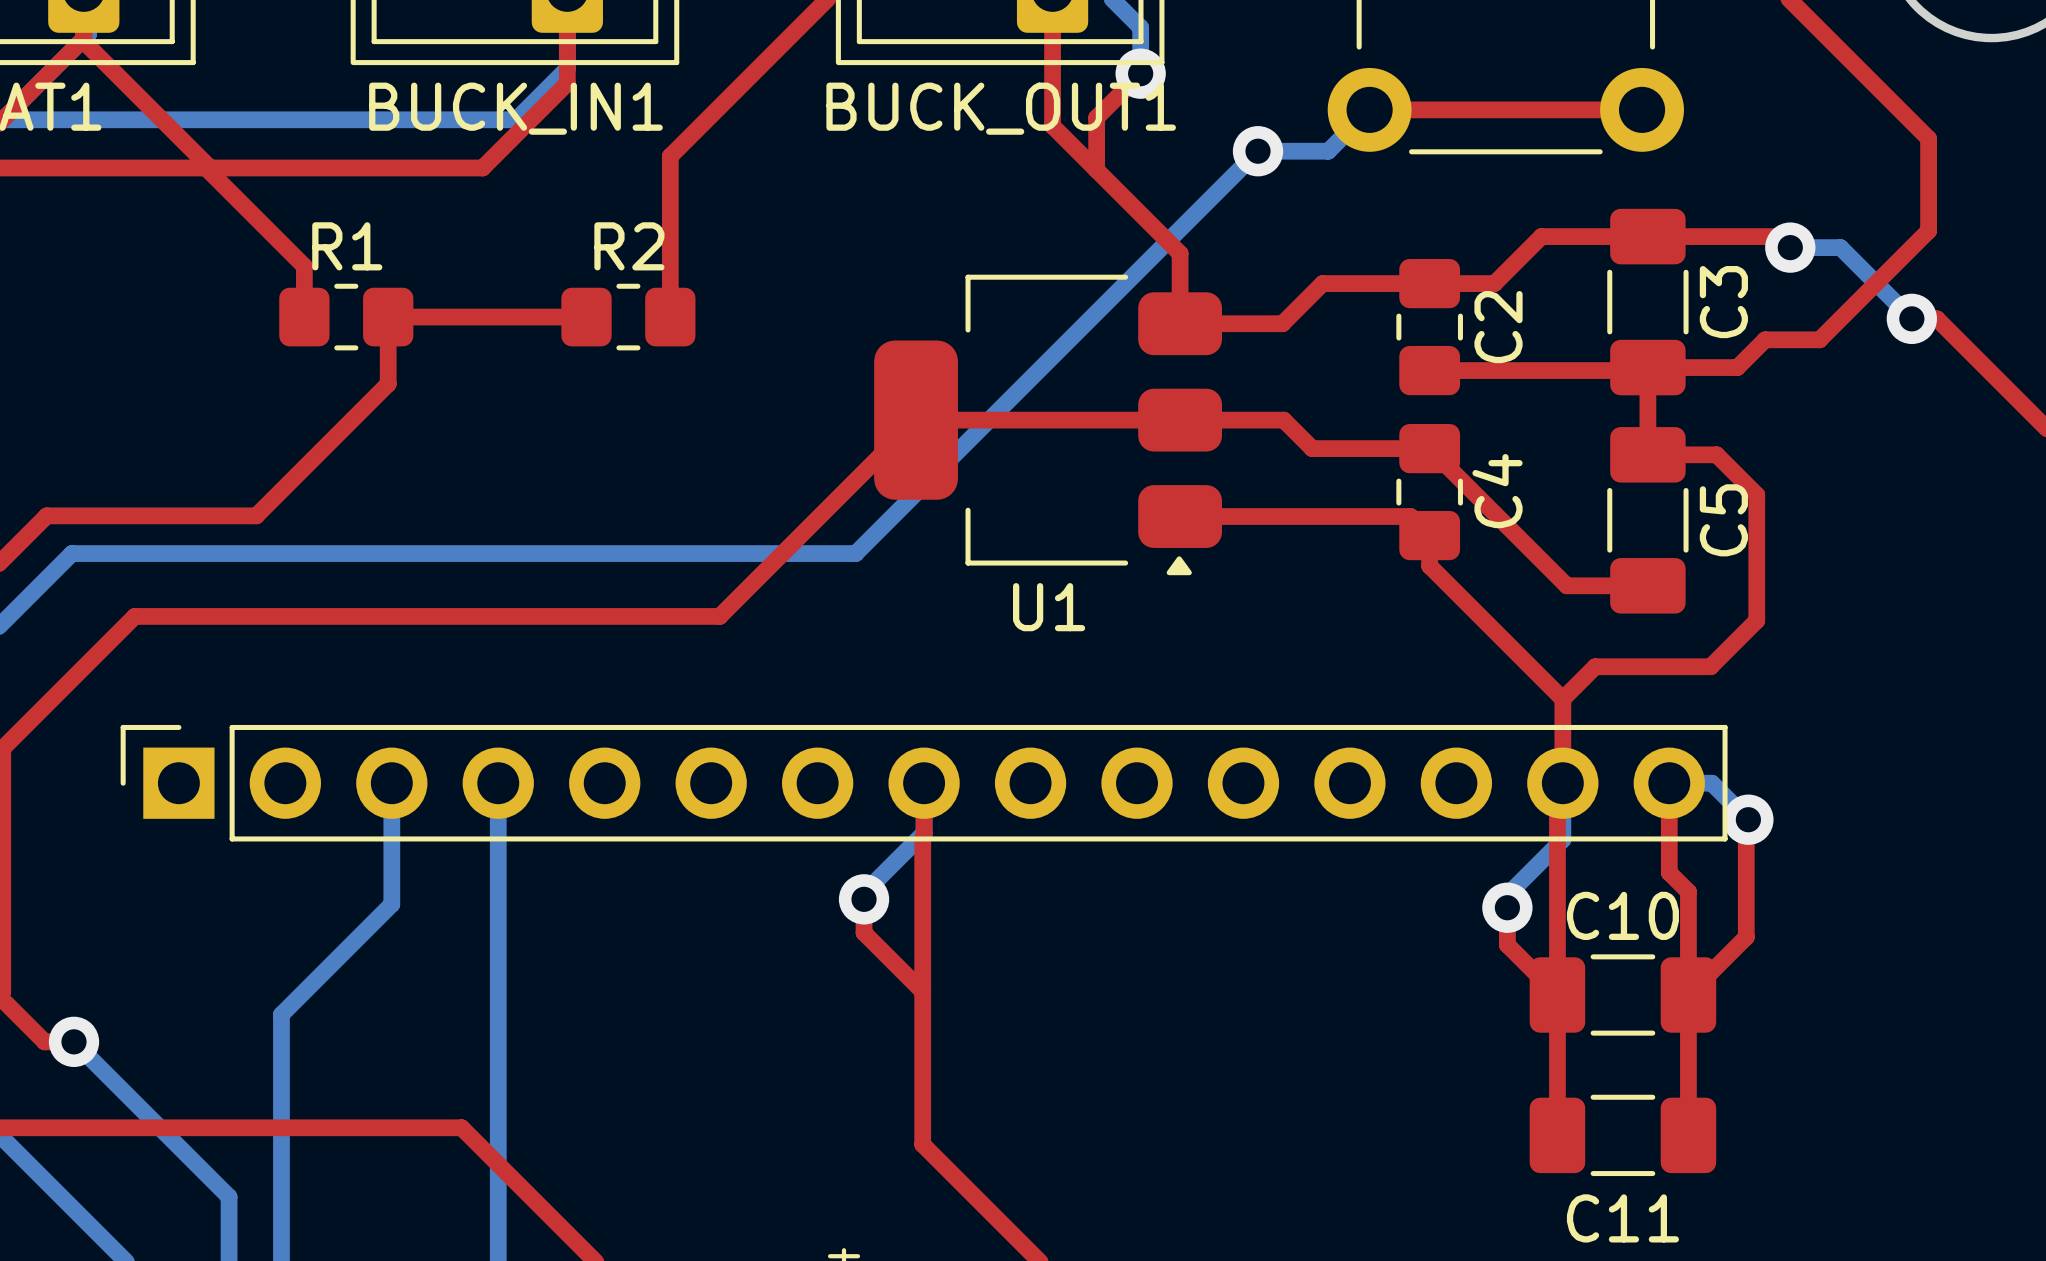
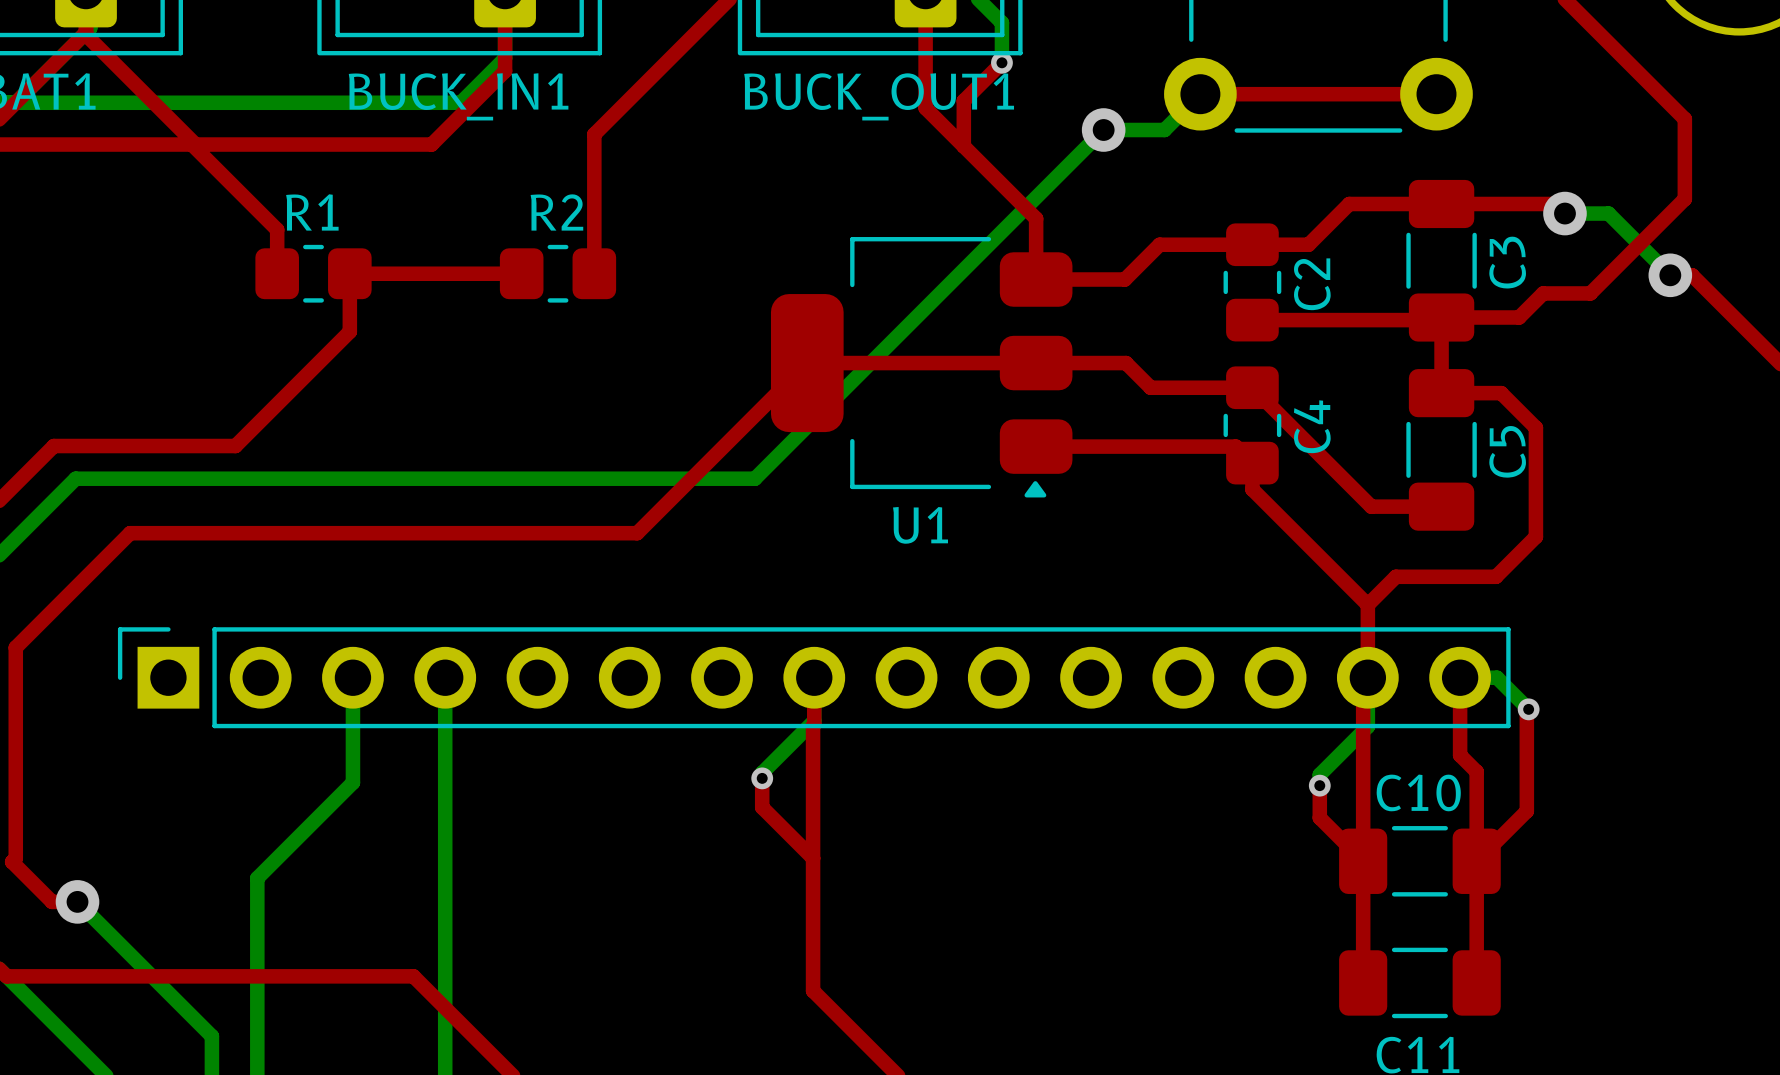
via size: [1115, 48, 1166, 99] -> [991, 51, 1013, 74]
via size: [1723, 794, 1774, 845] -> [1517, 698, 1540, 721]
via size: [838, 874, 890, 925] -> [751, 767, 774, 790]
via size: [1482, 882, 1533, 933] -> [1308, 774, 1331, 797]

